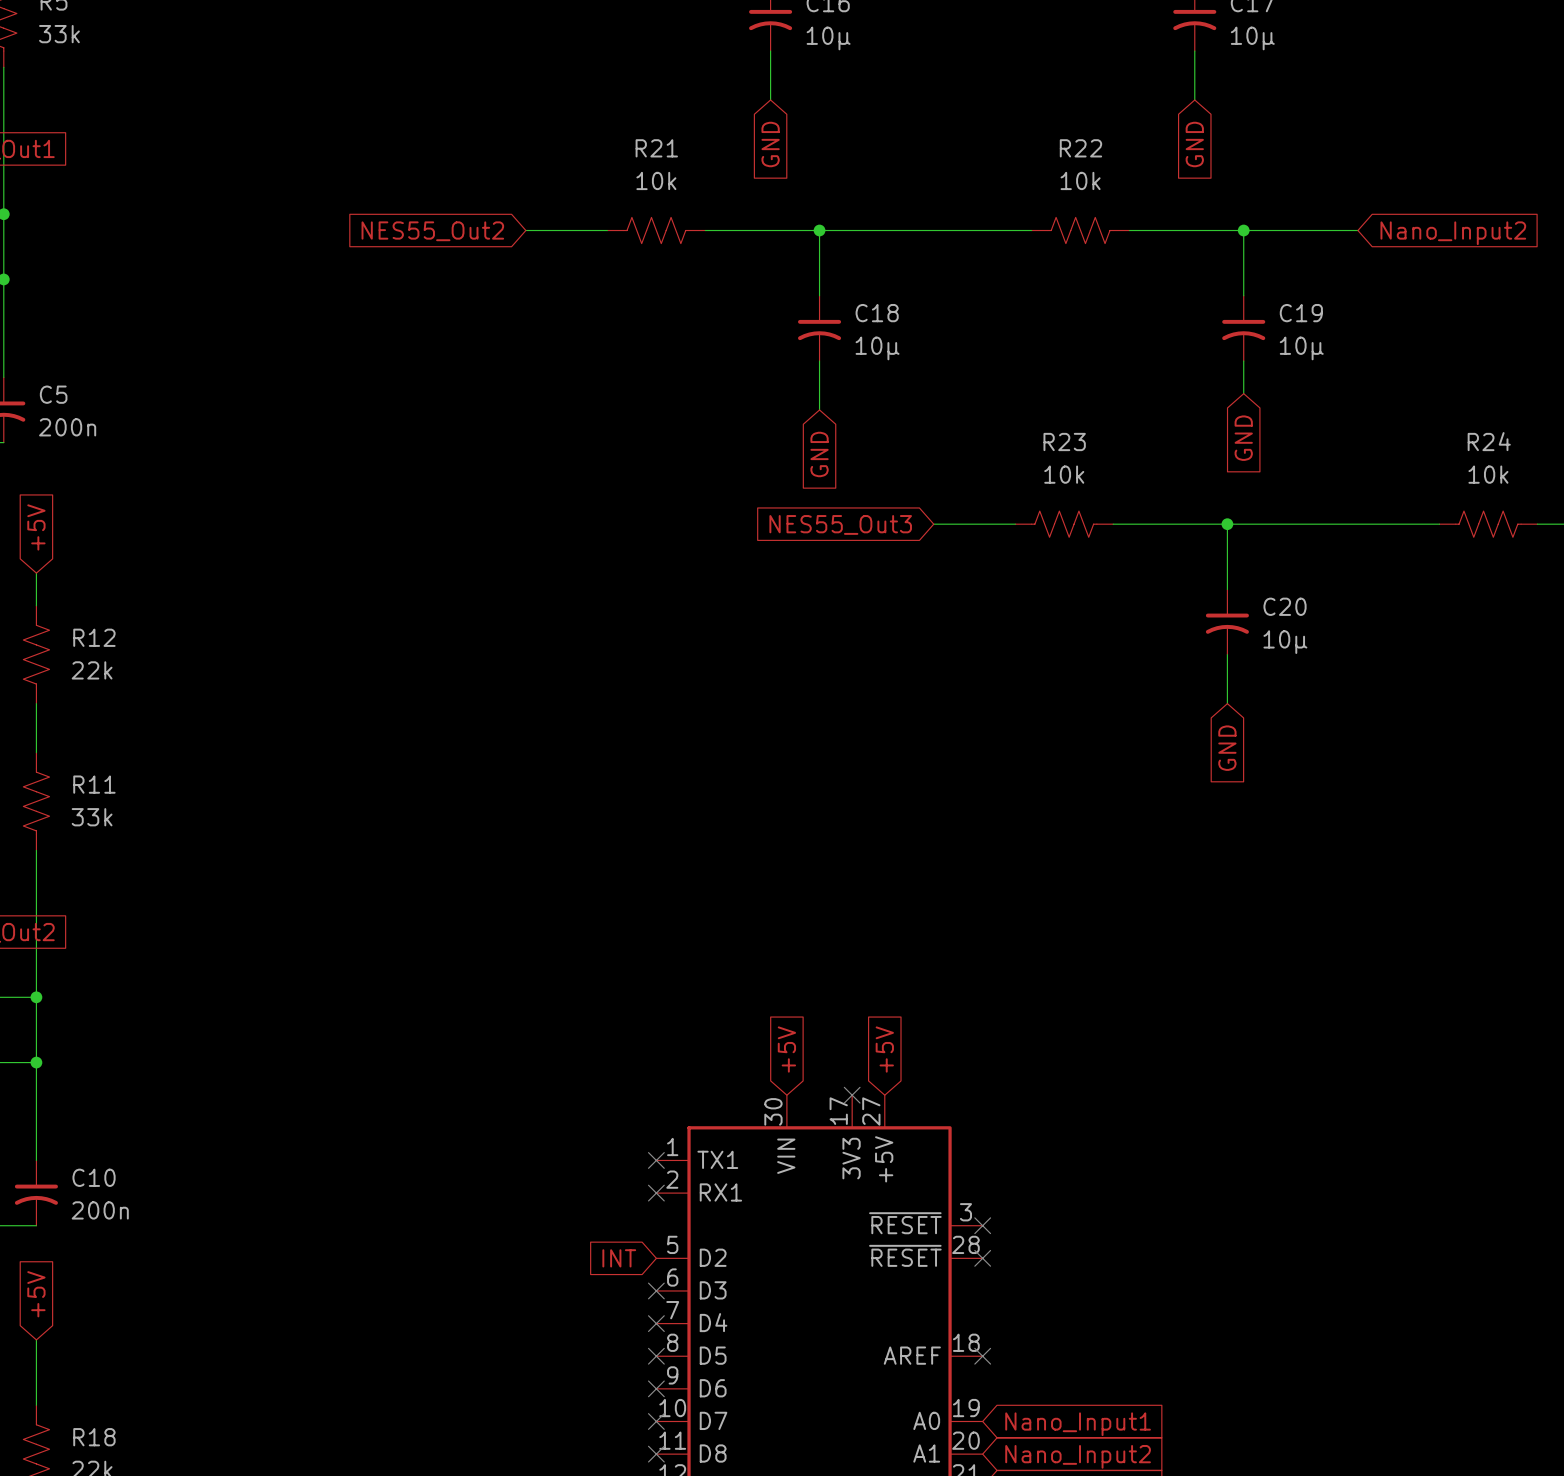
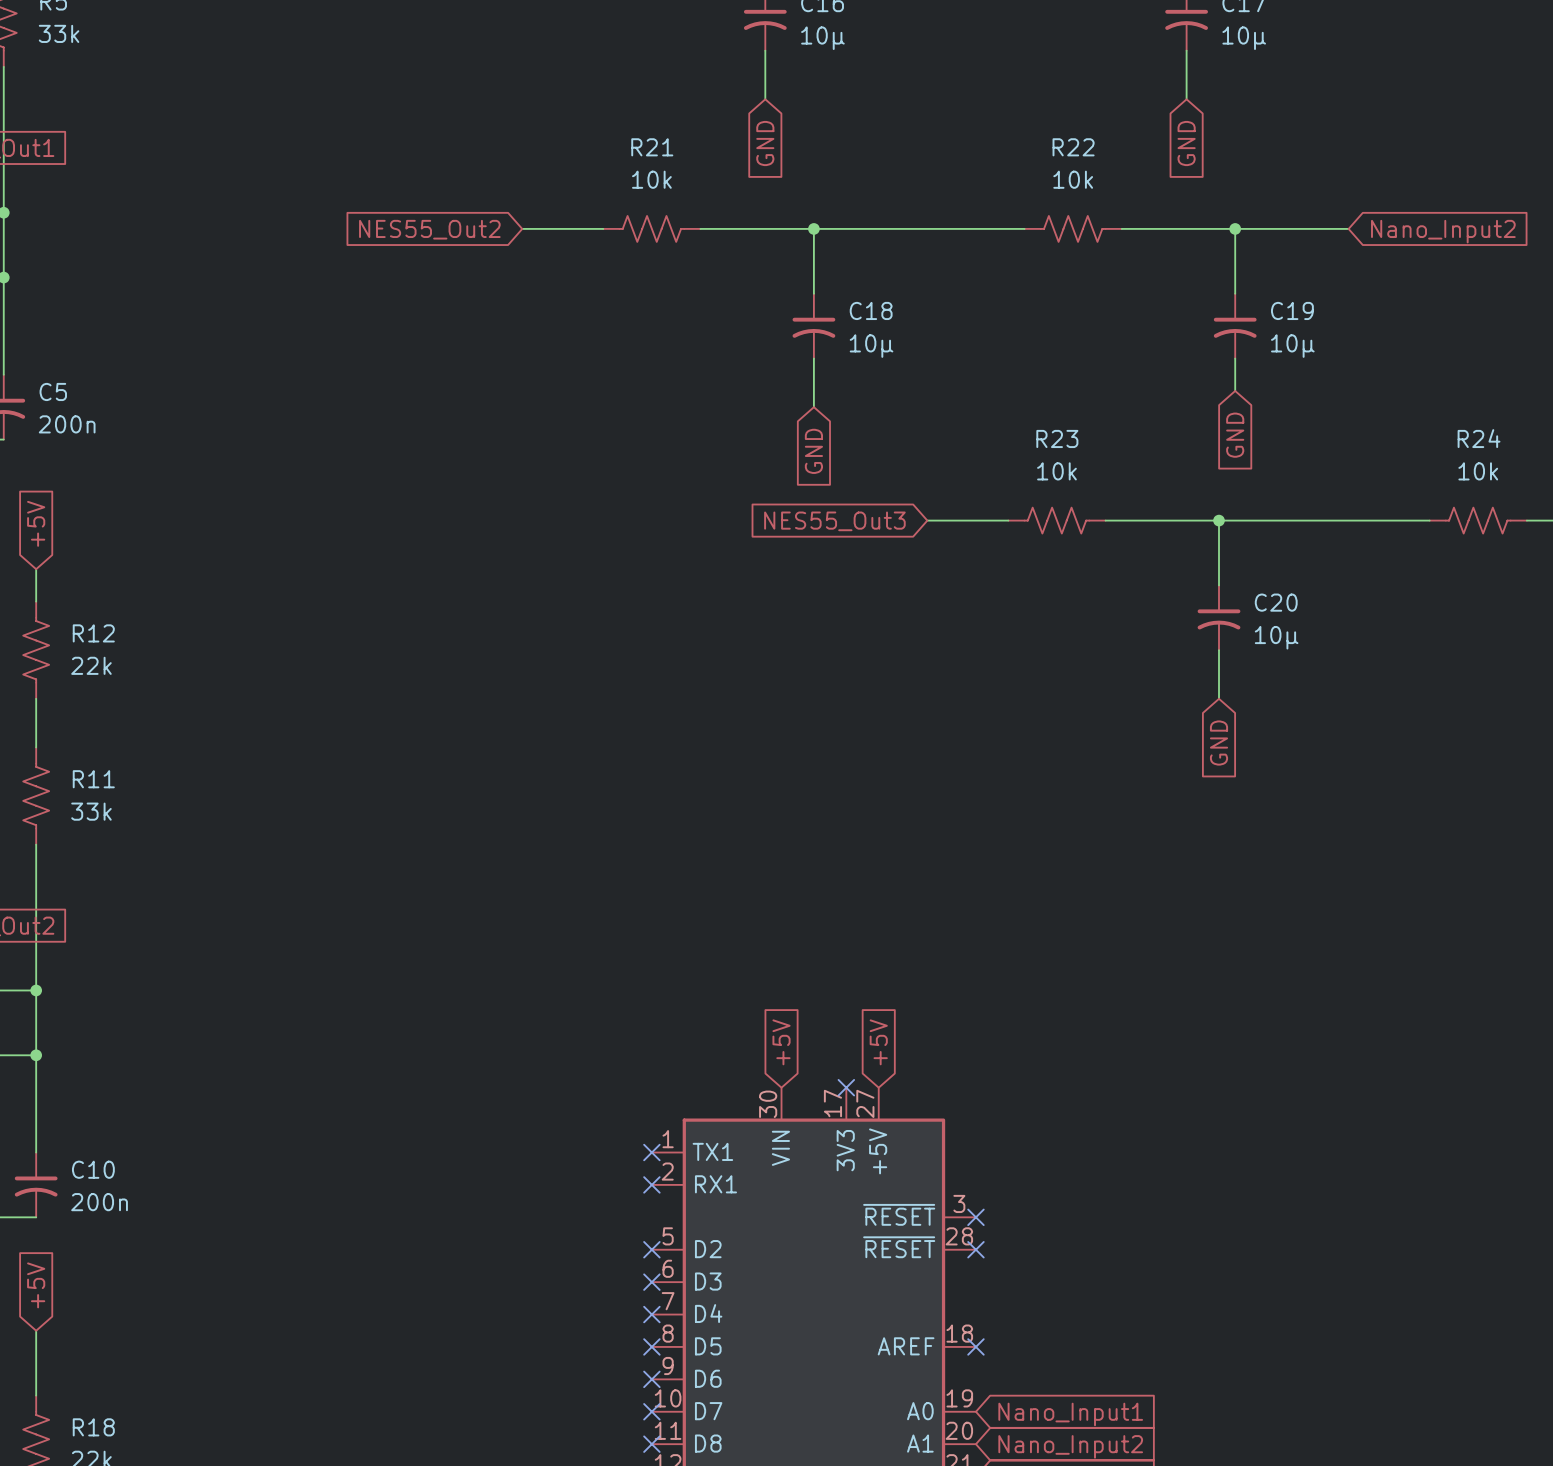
global label: INT (619, 1258) -> none
no-connect mark: none -> (651, 1249)

